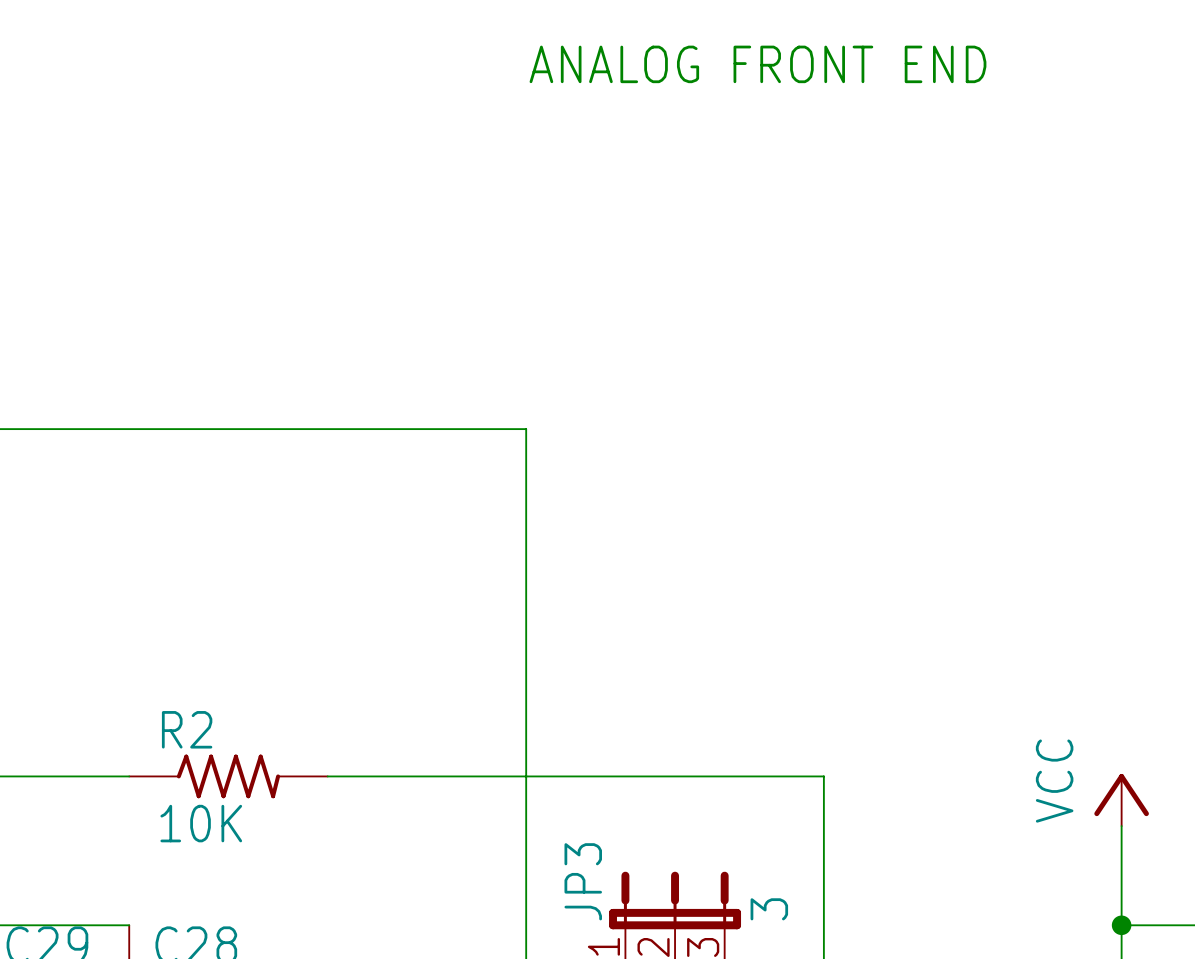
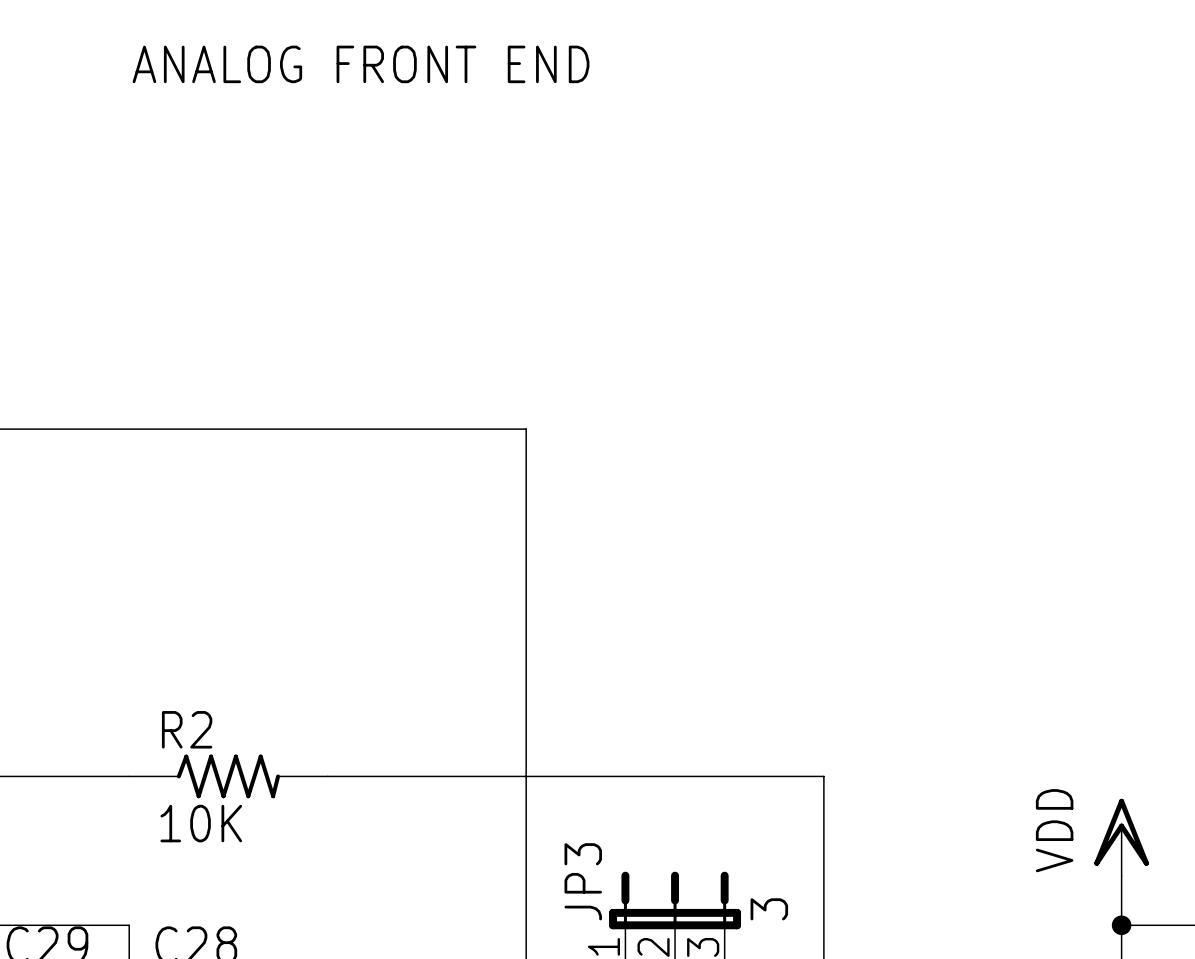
text position: ANALOG FRONT END (757, 64) -> ANALOG FRONT END (361, 64)
power symbol: VCC (1121, 800) -> none
power symbol: none -> VDD (1121, 837)

